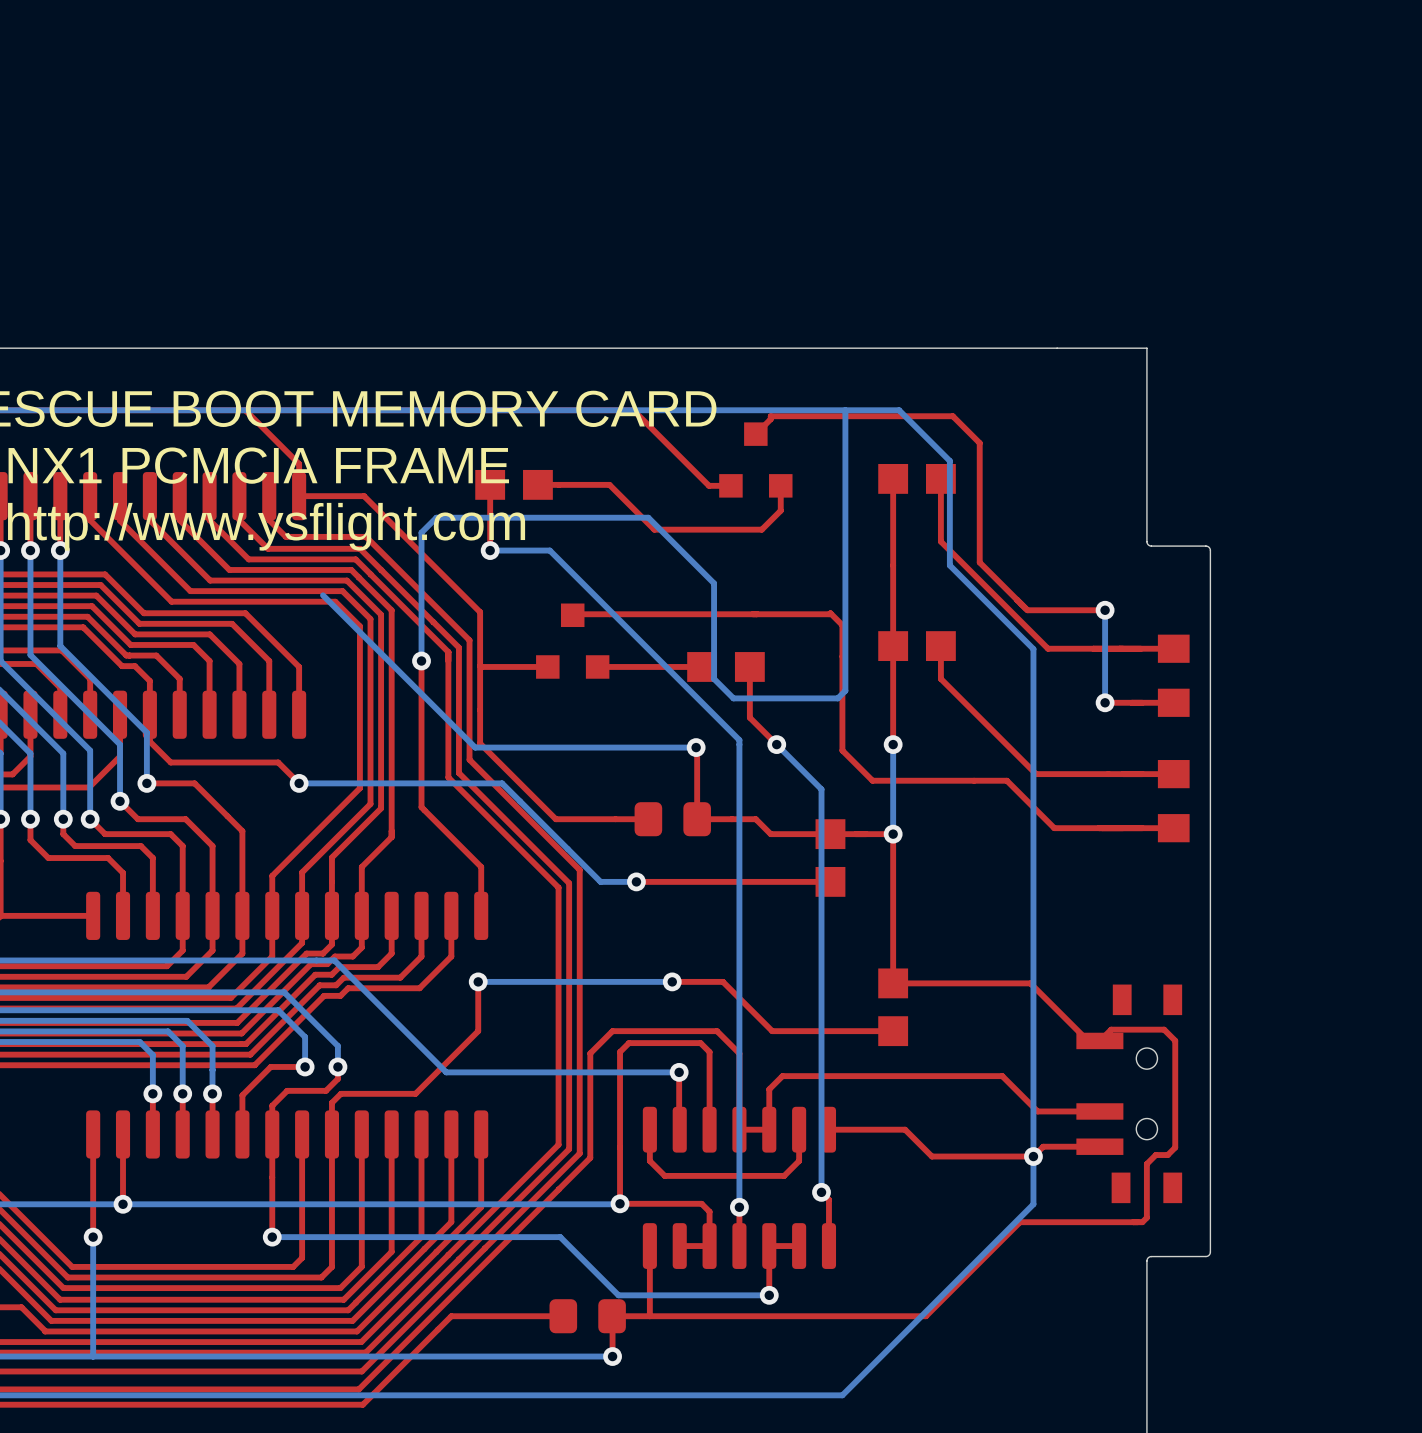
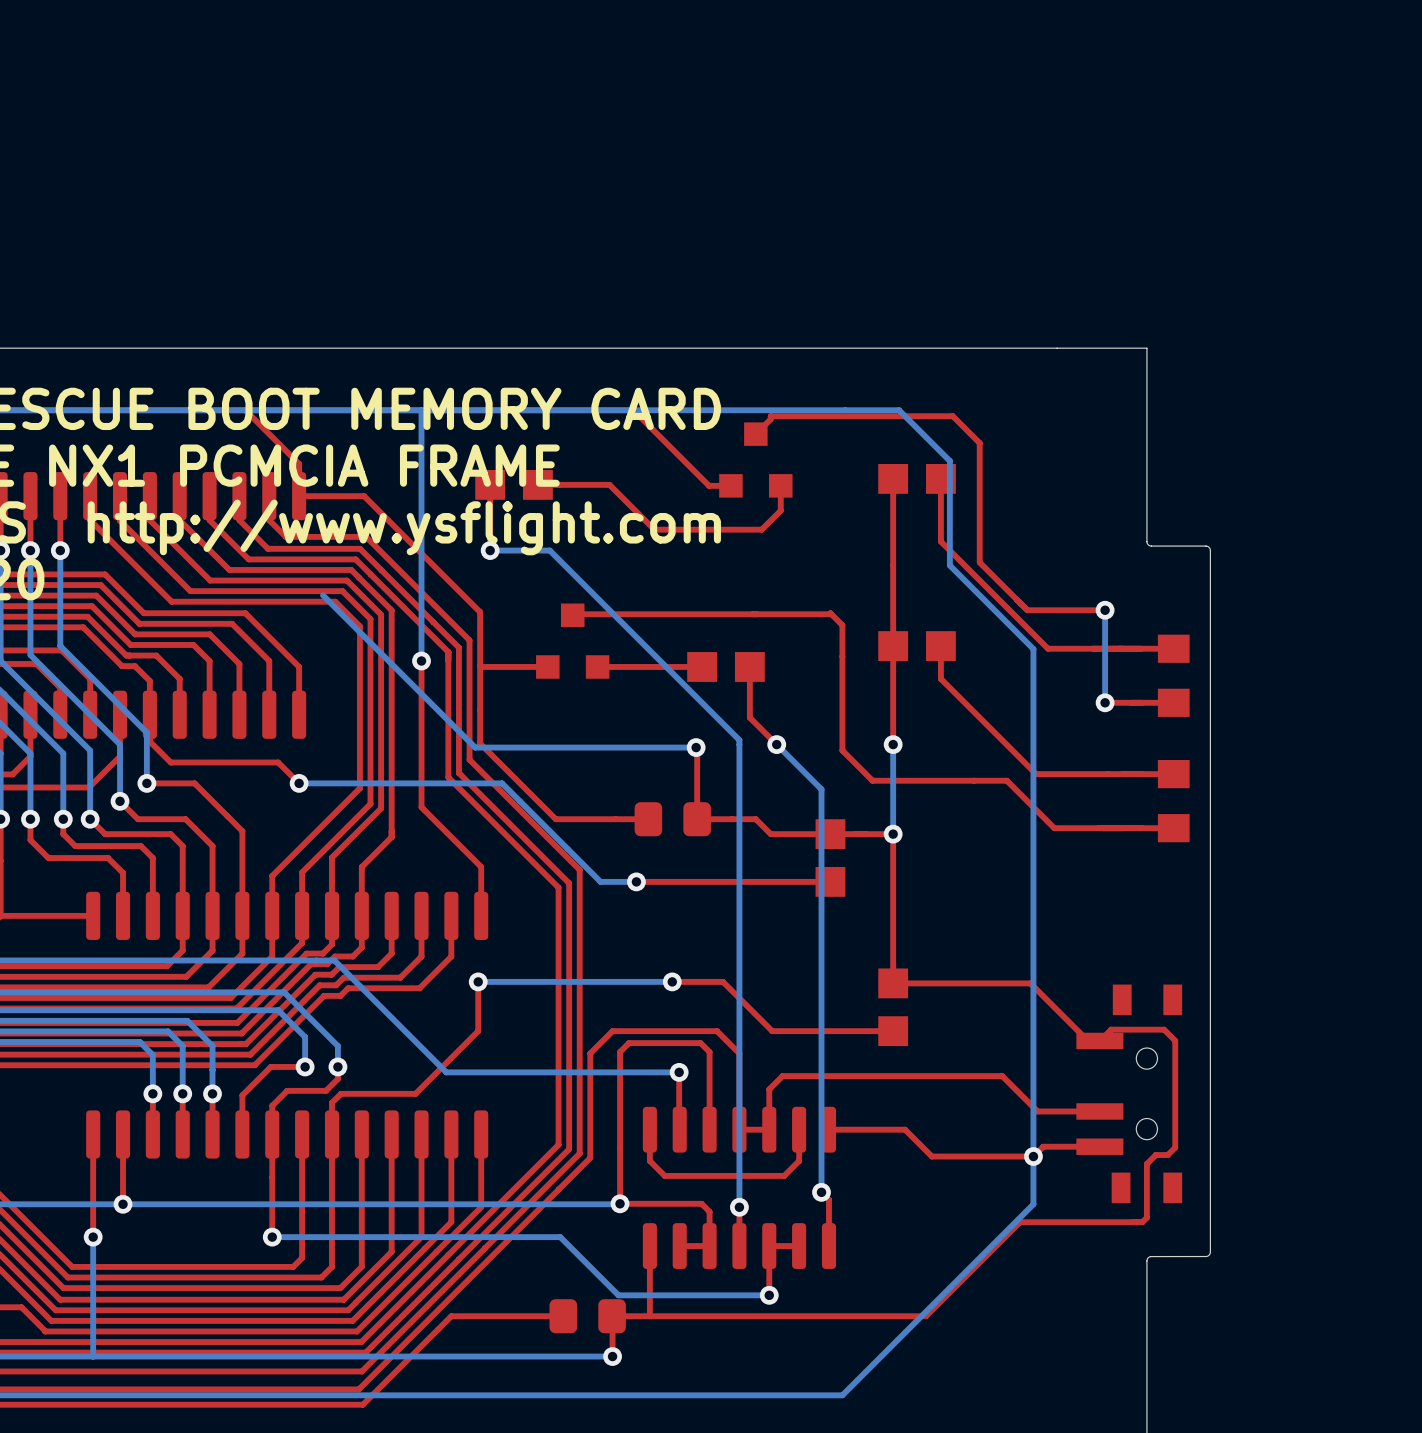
bottom track: (845, 410) (845, 690) (837, 698) (733, 698) (714, 678) (714, 583) (648, 517) (436, 517) (421, 532) -> (421, 410) (421, 532)

